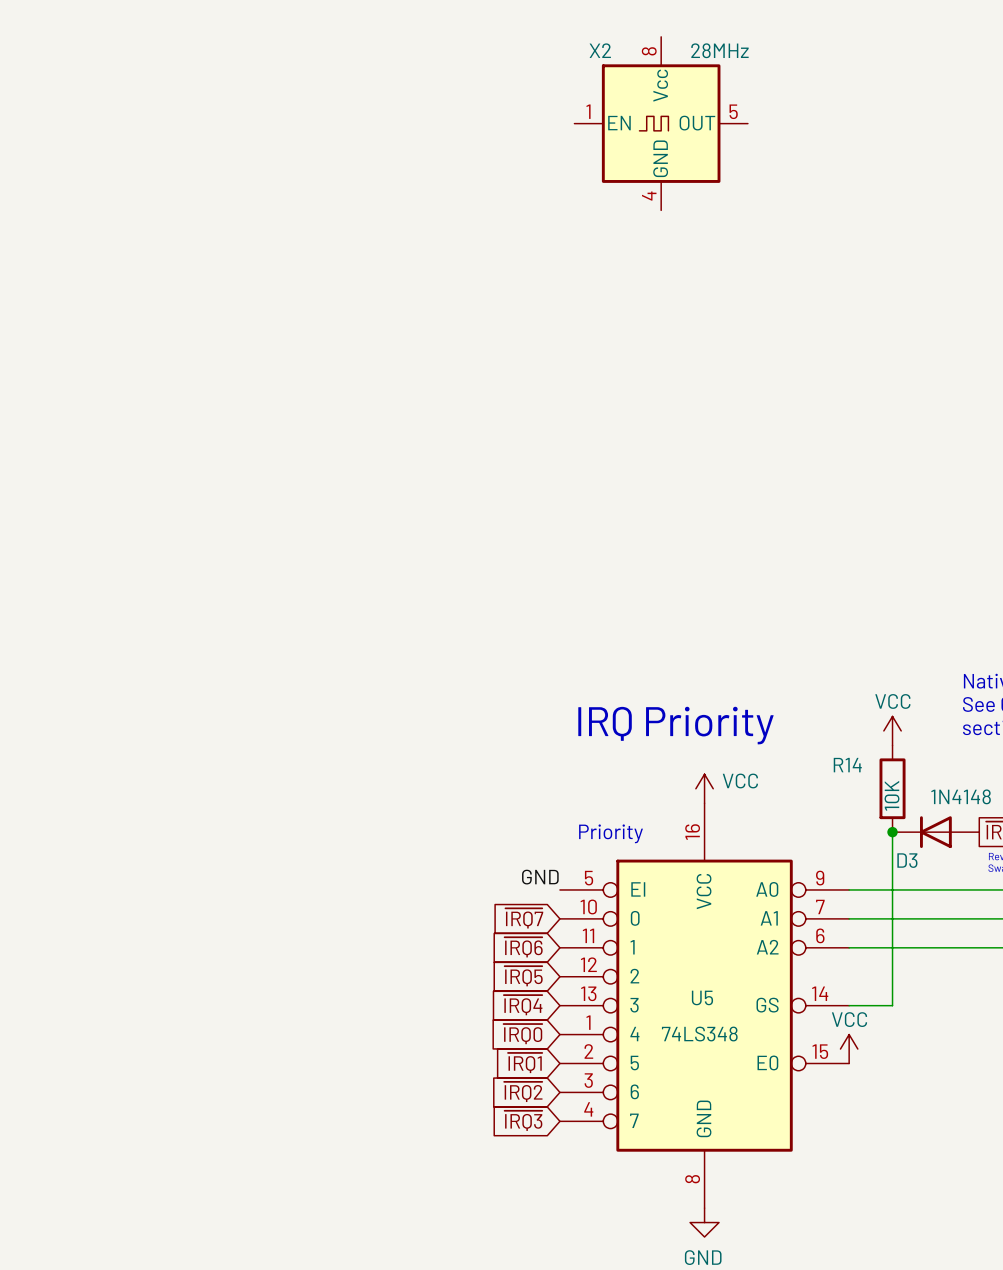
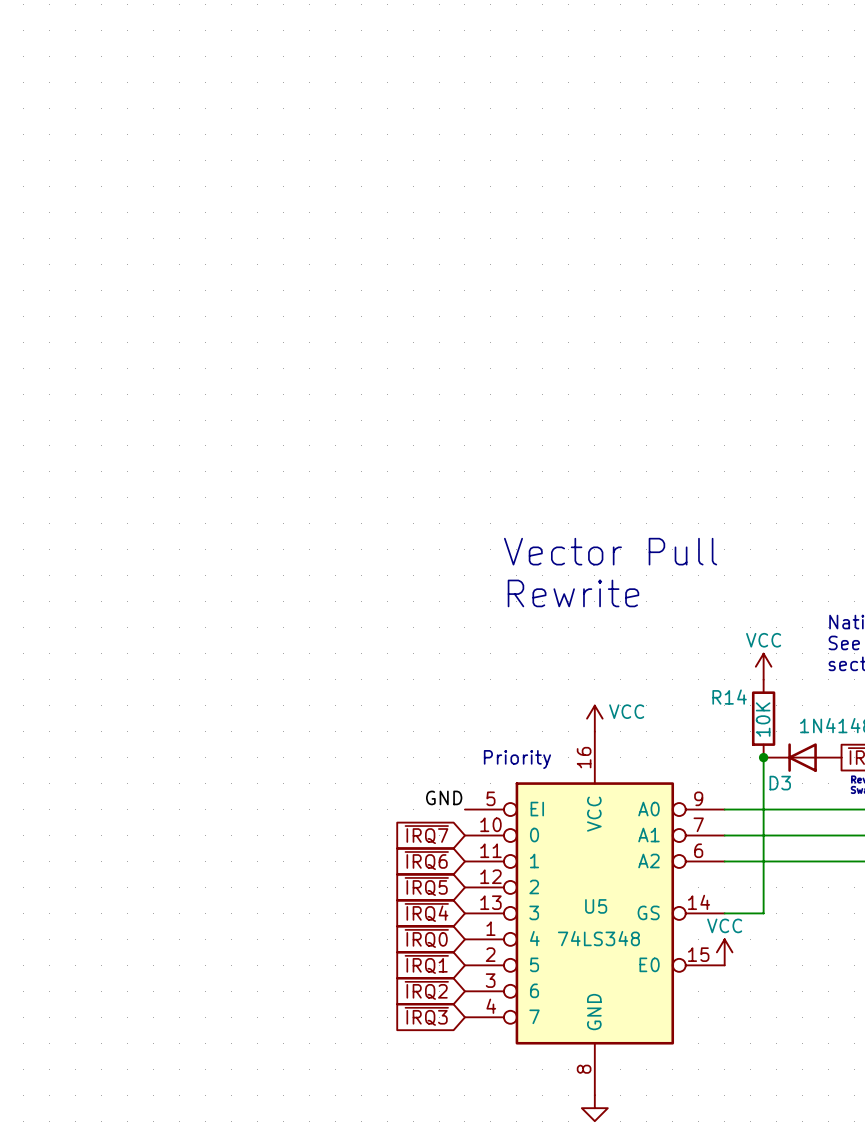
X2: 28MHz (661, 123) -> none
text: none -> Vector Pull (610, 551)
text: none -> Rewrite (573, 593)
text: IRQ Priority (676, 725) -> none

